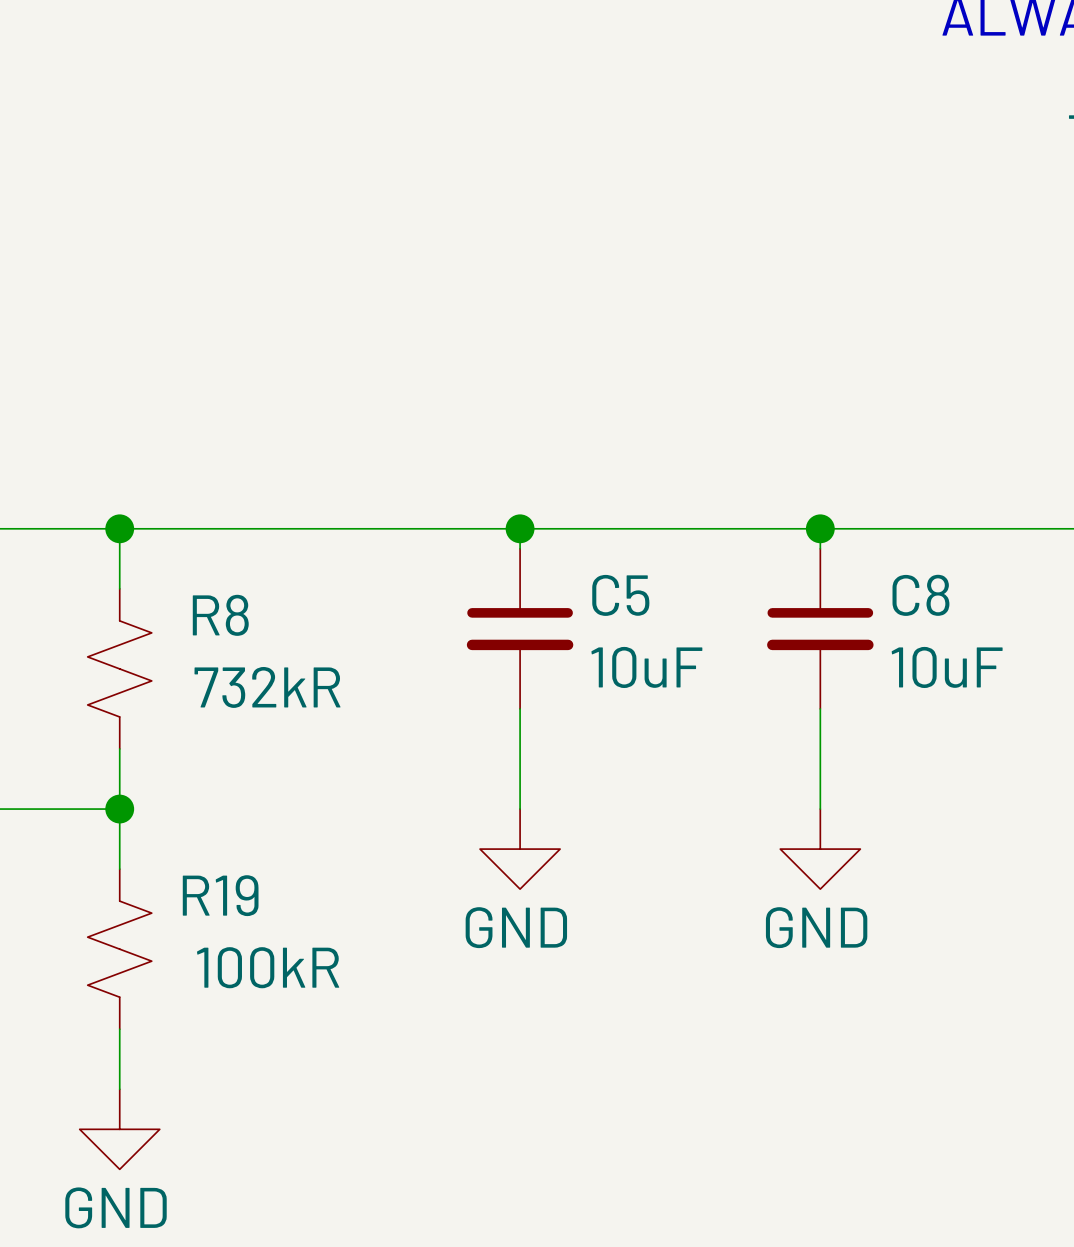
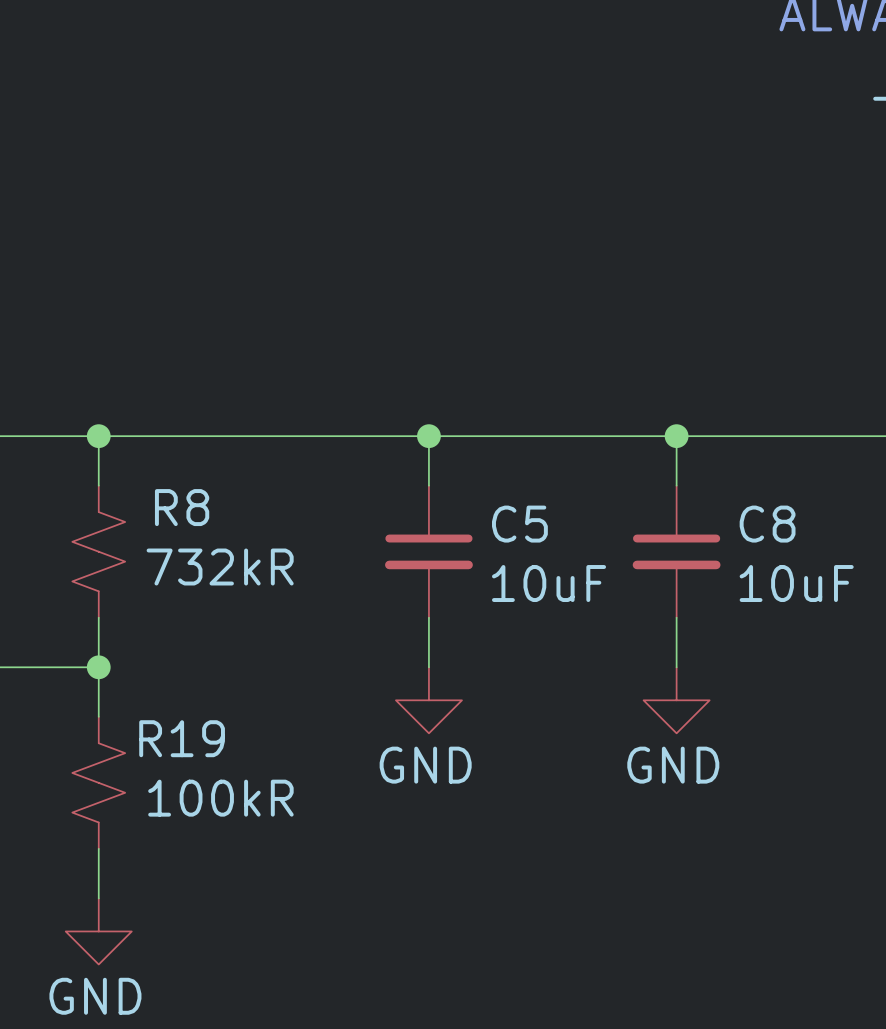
C5 position: (520, 628) -> (428, 551)
C8 position: (820, 628) -> (676, 551)

